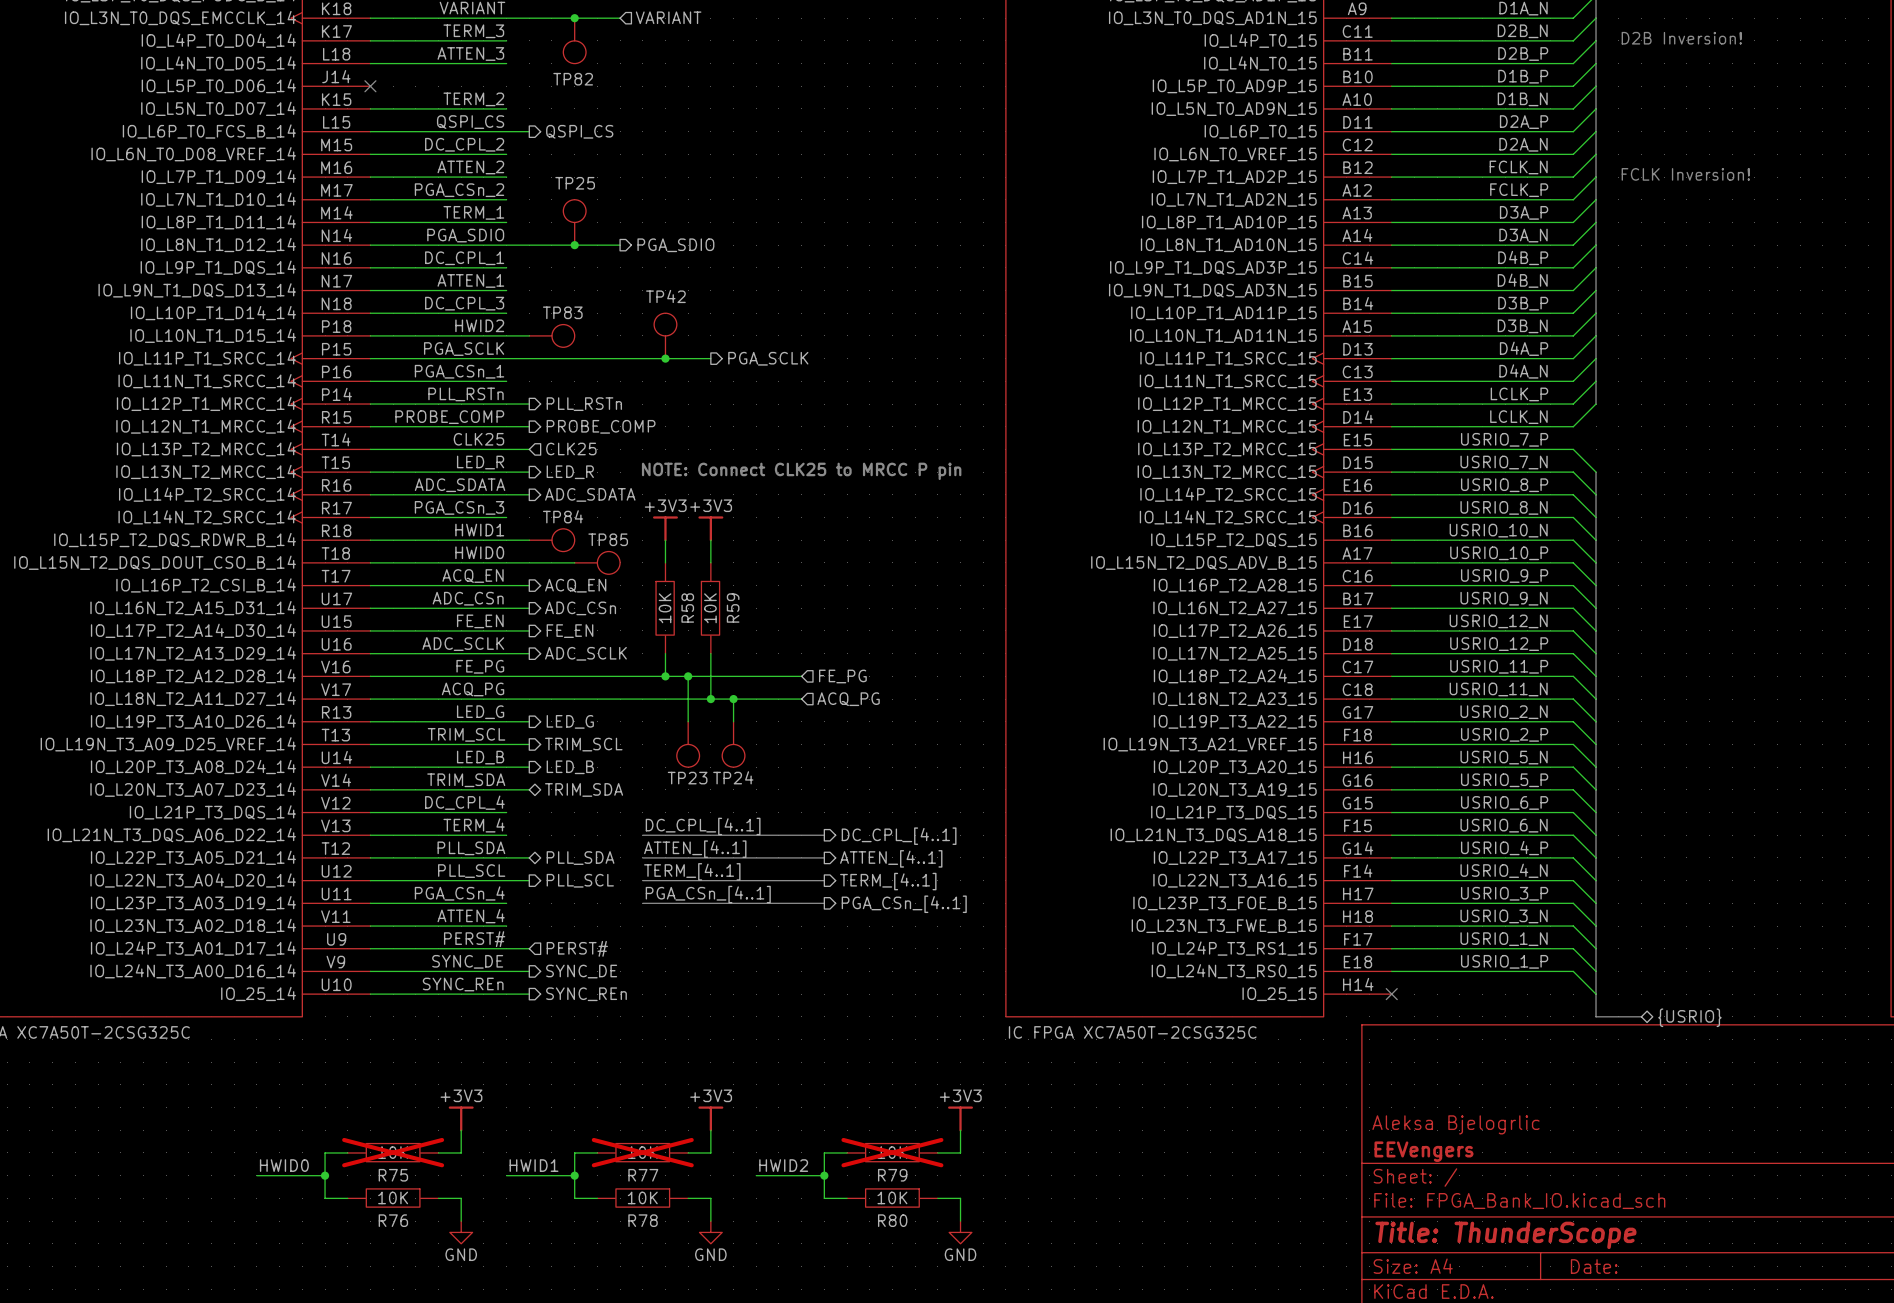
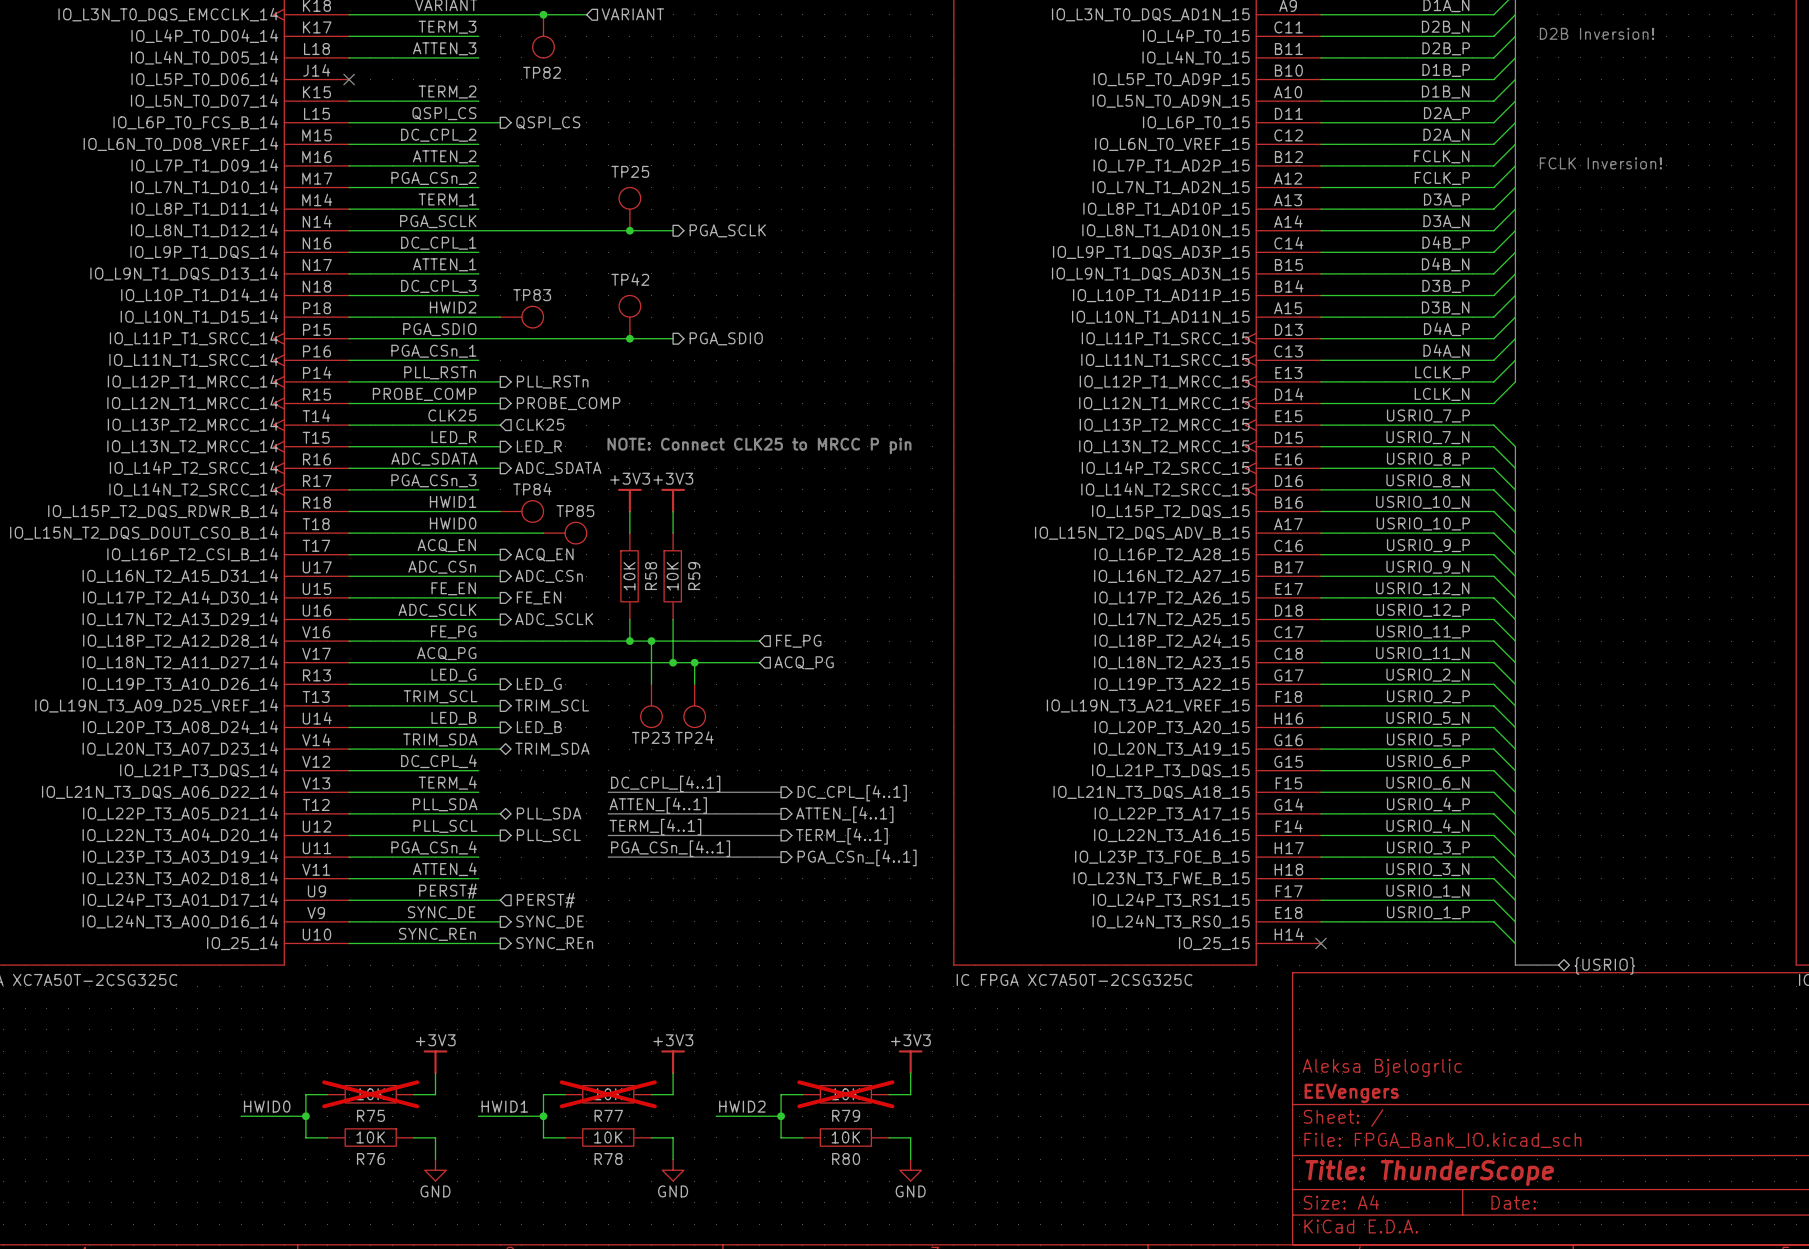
TP25 position: (574, 222) -> (629, 209)
label: PGA_SDIO (465, 235) -> PGA_SCLK (438, 221)
junction: (574, 245) -> none
wire: none -> (586, 230) (673, 230)
junction: none -> (629, 230)
hierarchical label: PGA_SDIO (675, 245) -> PGA_SCLK (727, 230)
label: PGA_SCLK (464, 349) -> PGA_SDIO (439, 329)
hierarchical label: PGA_SCLK (768, 358) -> PGA_SDIO (726, 338)

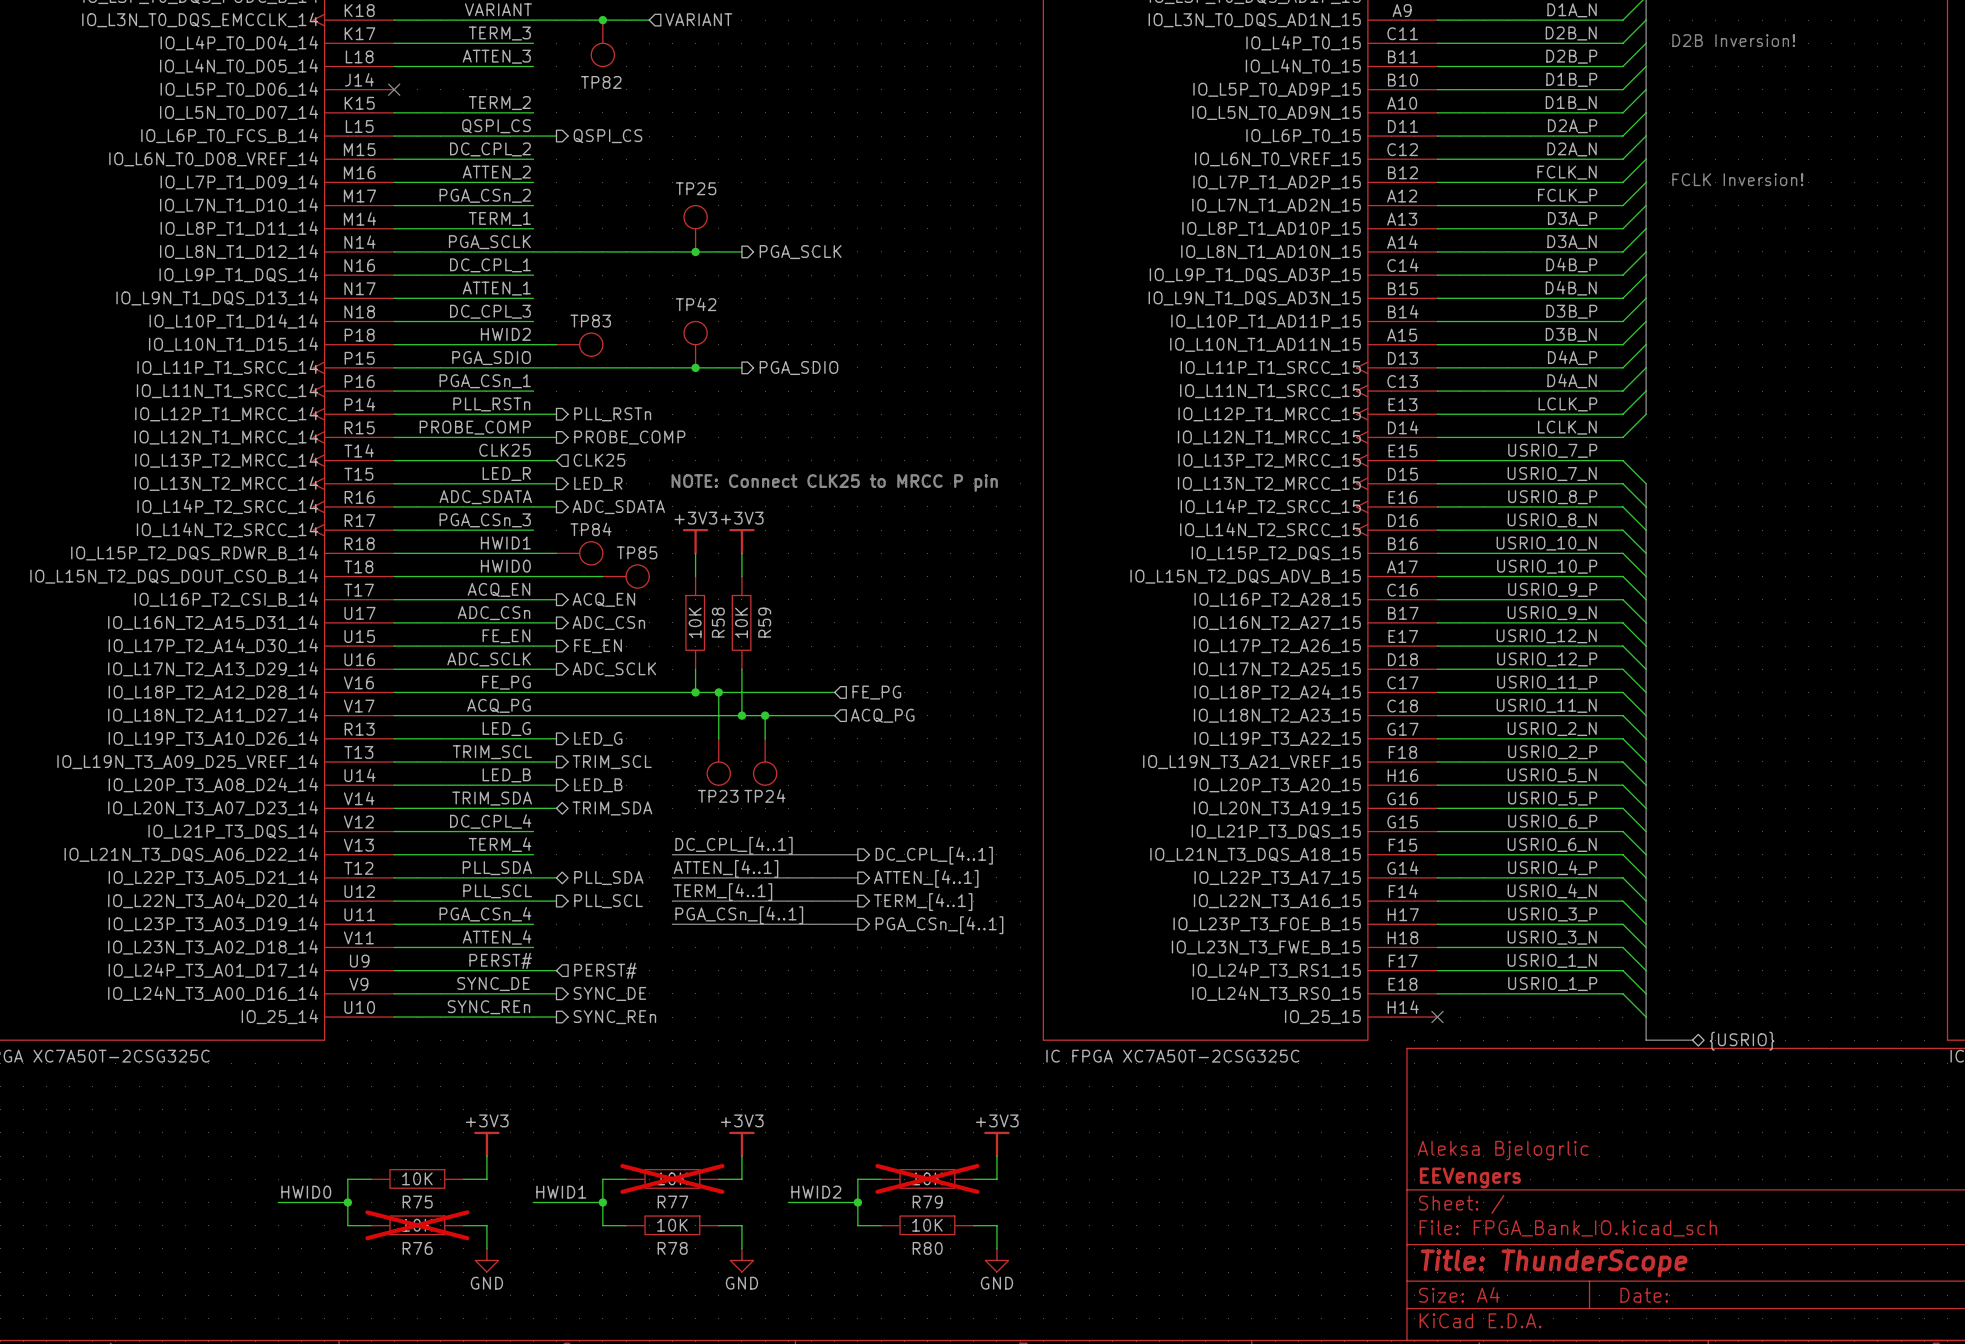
R75 do-not-place cross: (370, 1094) -> none
R76 do-not-place cross: none -> (417, 1225)

